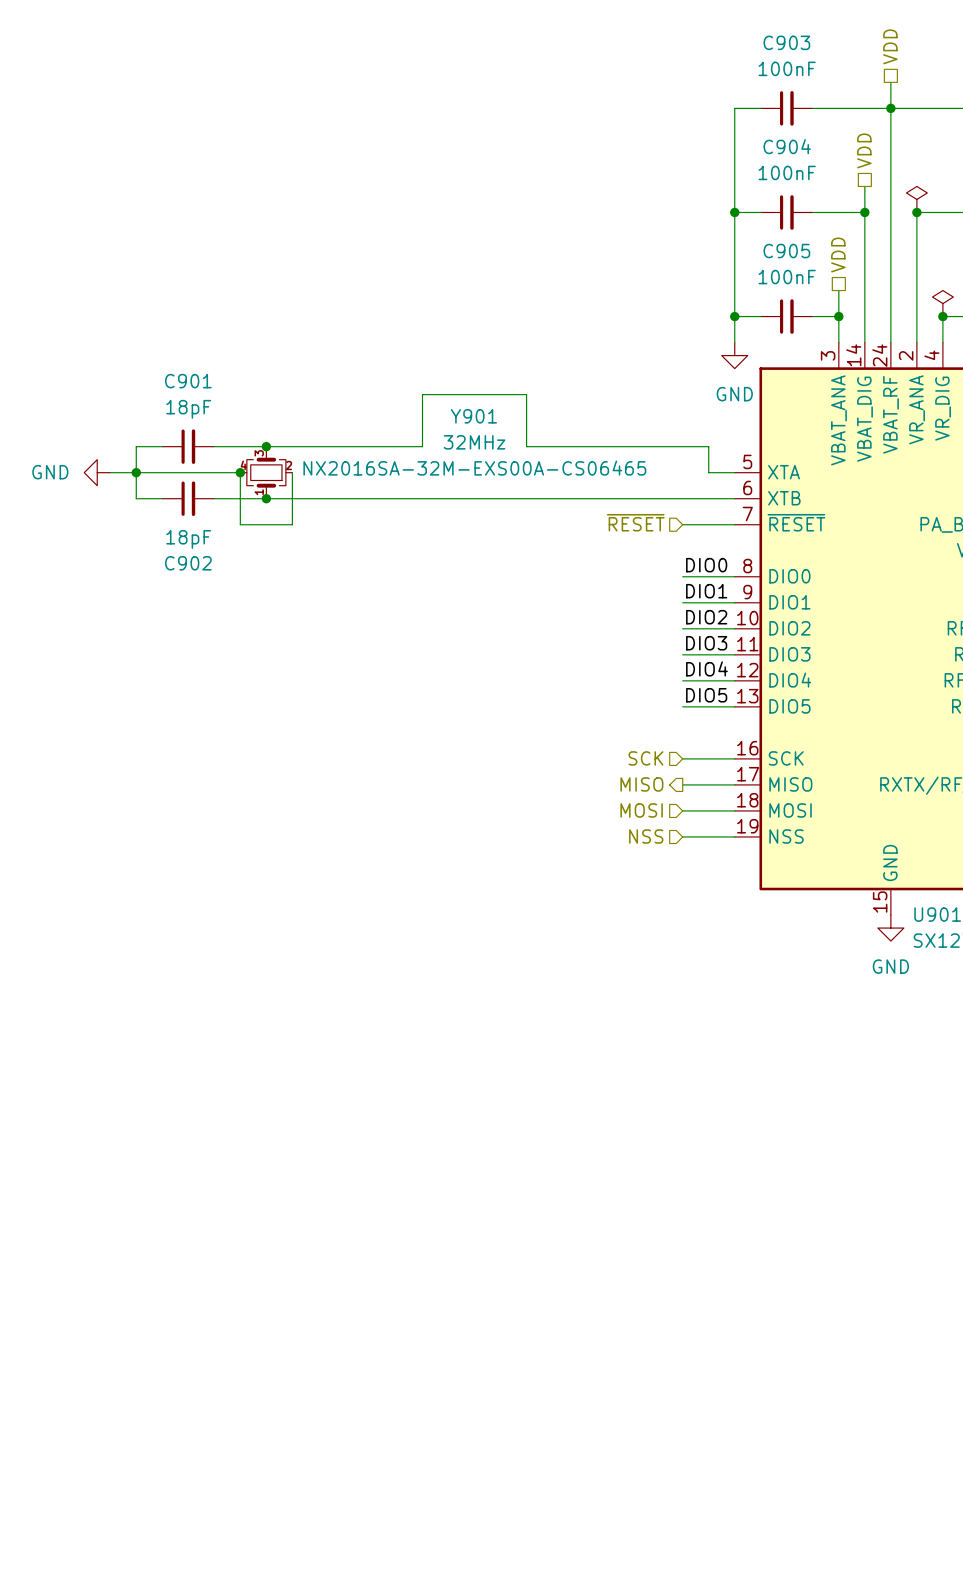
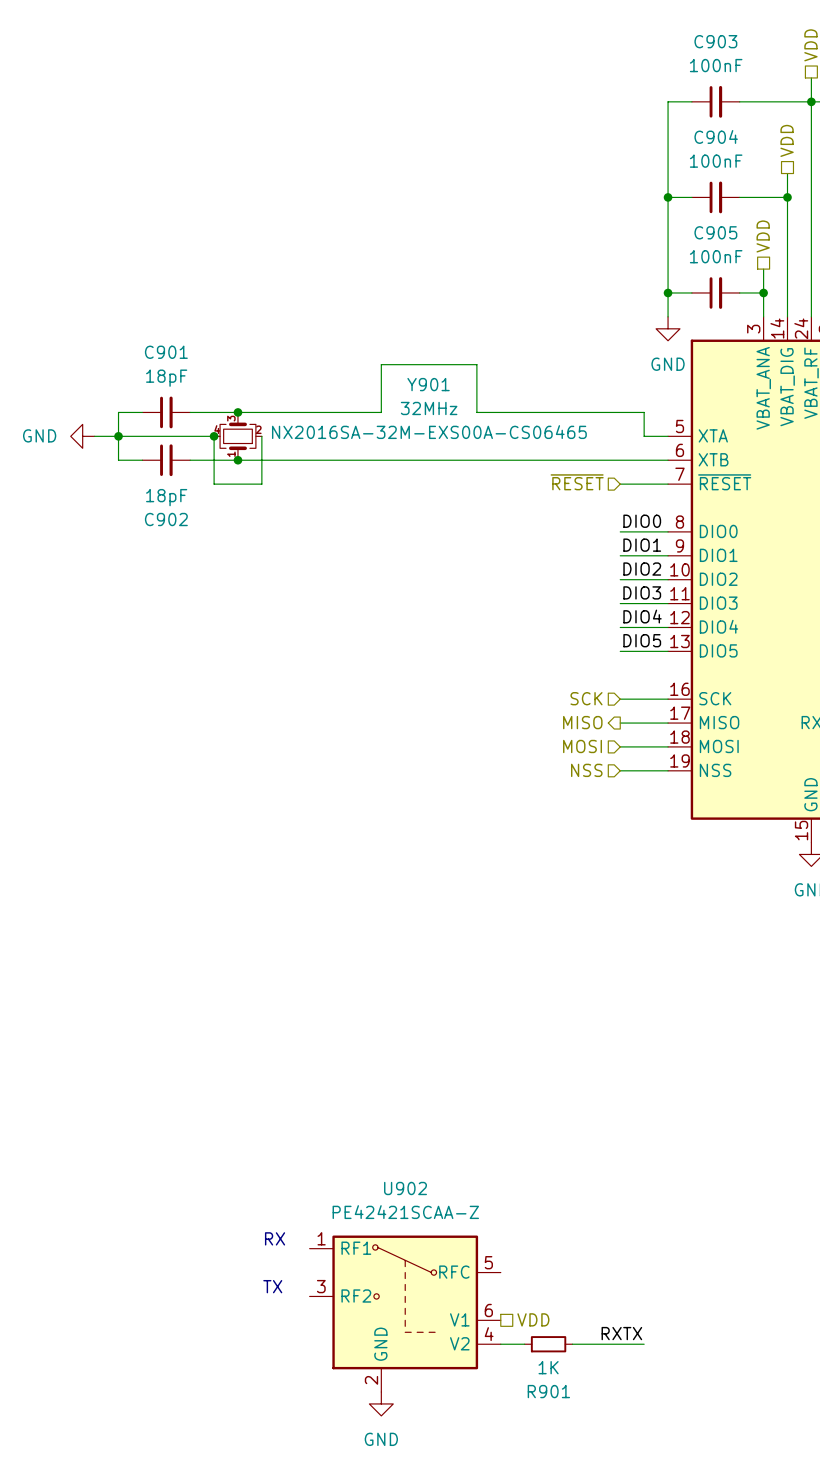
text: none -> RX (275, 1238)
text: none -> TX (272, 1286)
U902: none -> PE42421SCAA-Z (405, 1313)
hierarchical label: none -> VDD (533, 1319)
label: none -> RXTX (621, 1333)
wire: none -> (500, 1344) (524, 1344)
R901: none -> 1K (548, 1344)
wire: none -> (572, 1344) (644, 1344)
power symbol: none -> GND (381, 1403)

